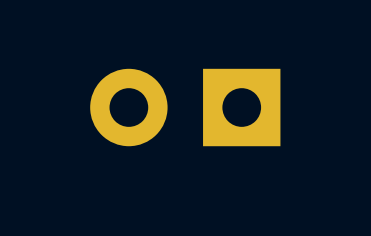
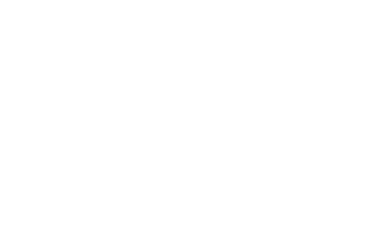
part: (185, 107) -> none

